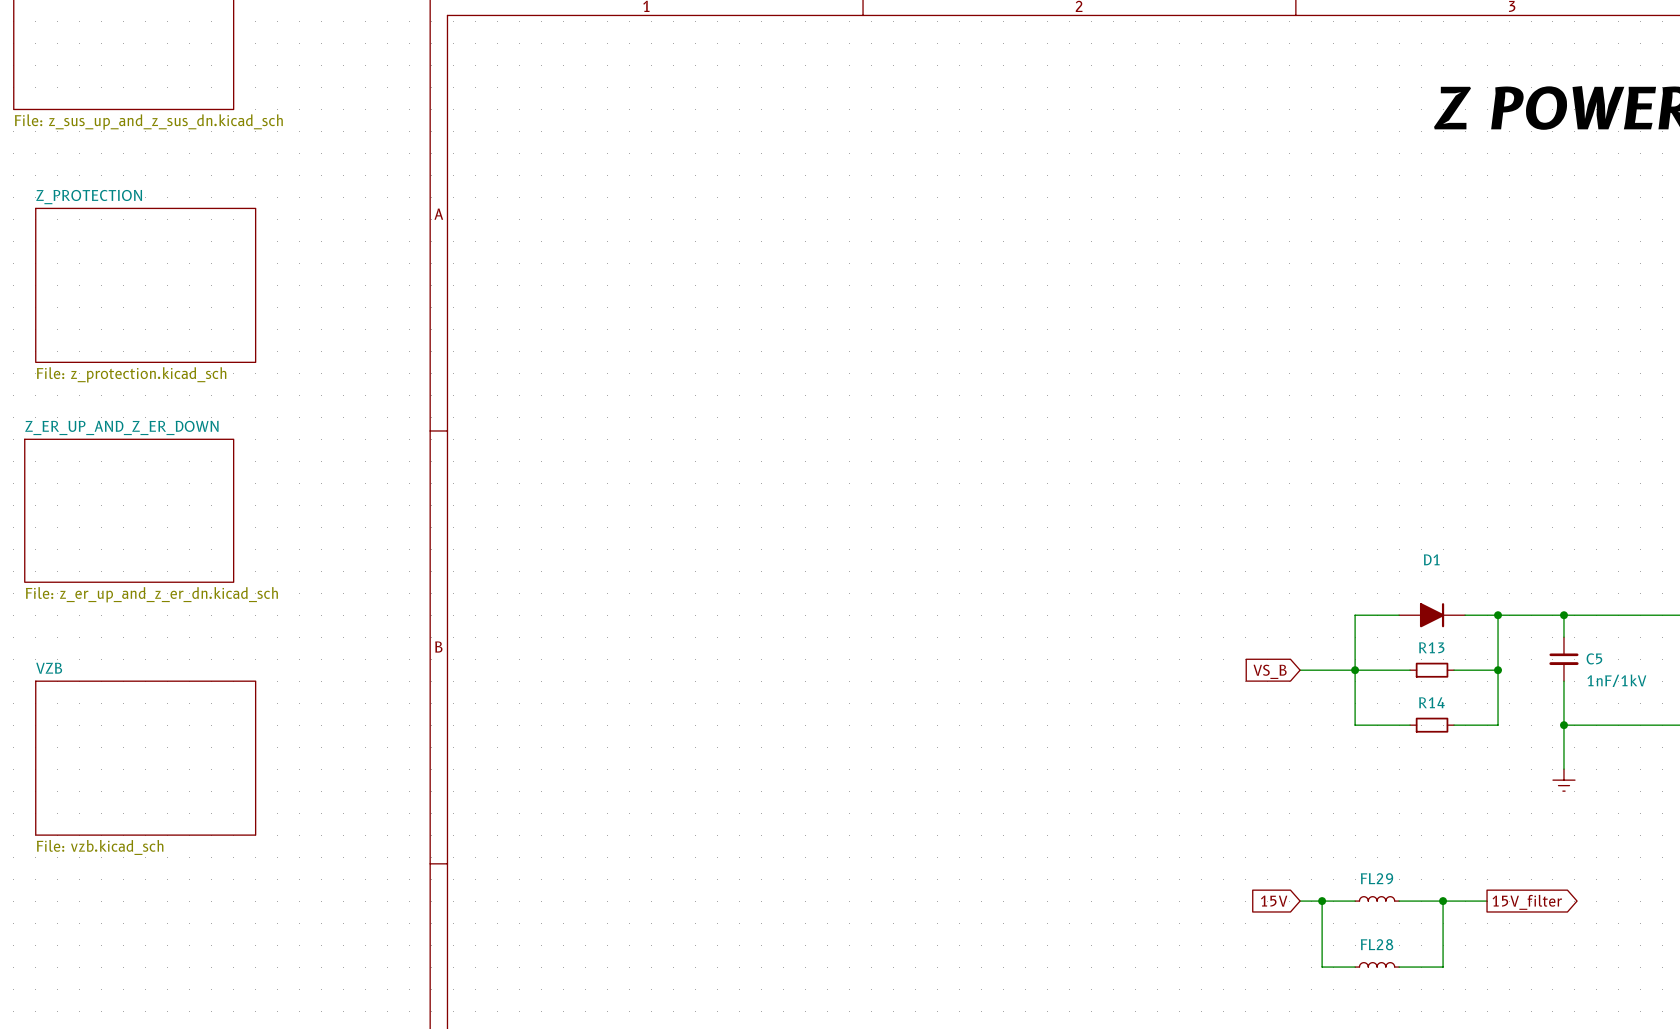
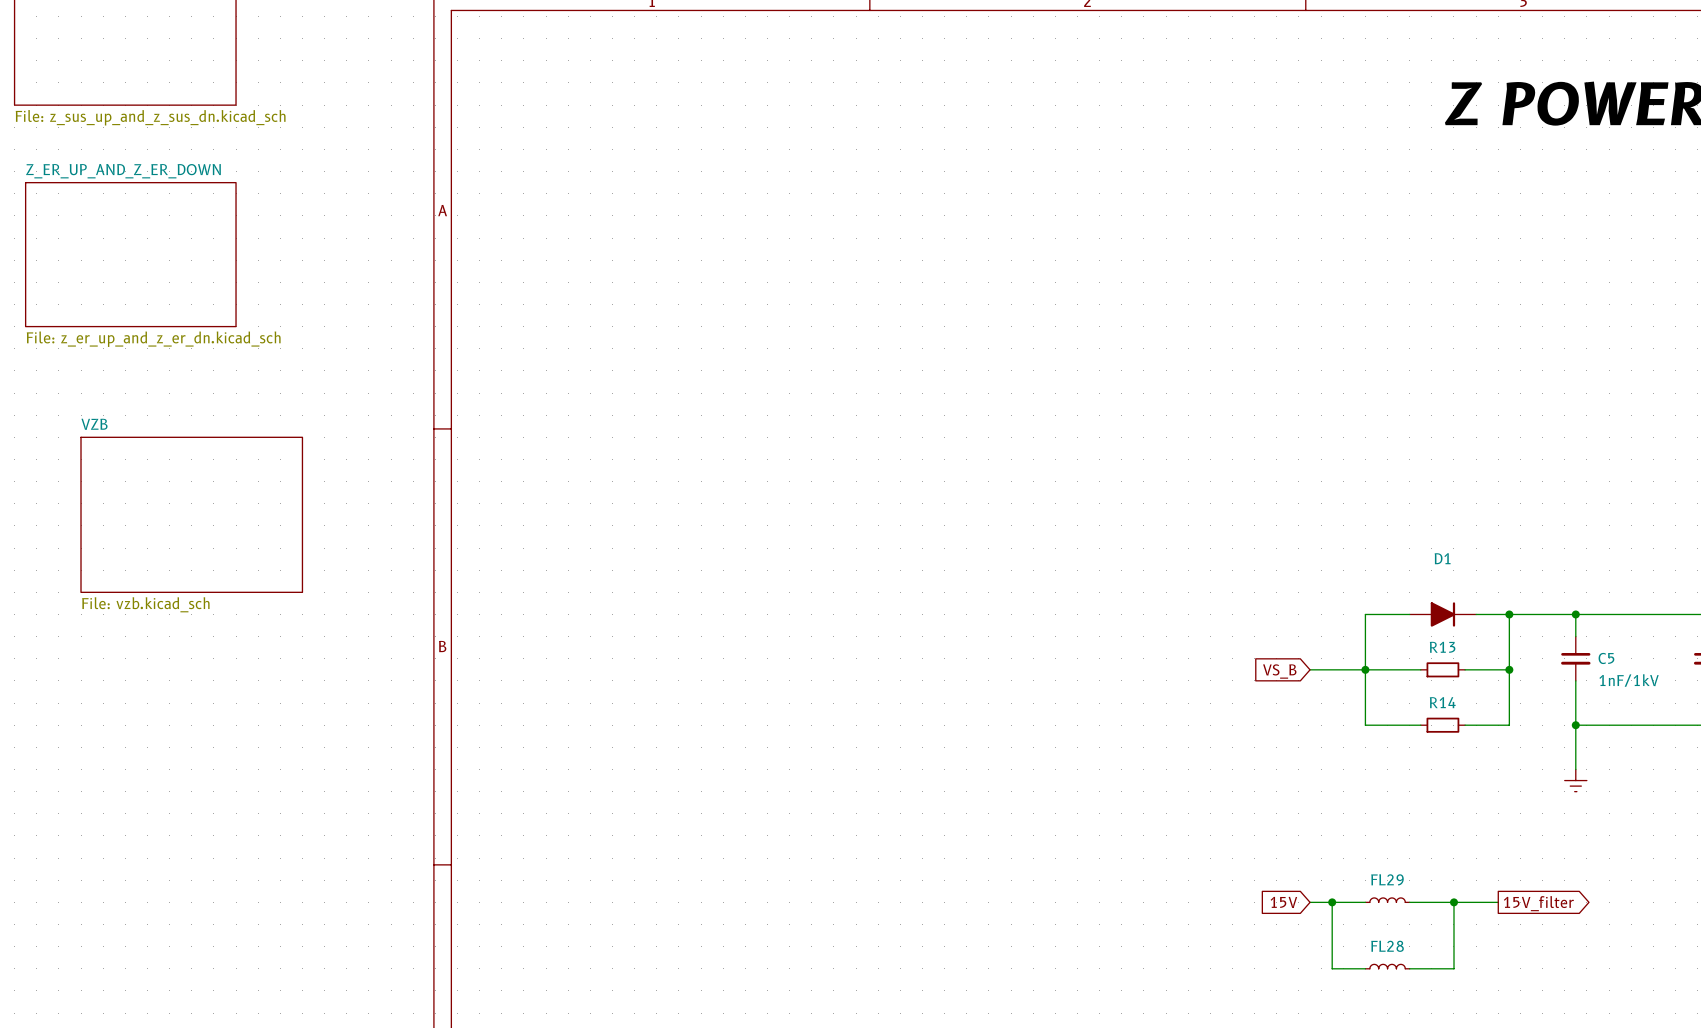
sheet Z_ER_UP_AND_Z_ER_DOWN: none -> File: z_er_up_and_z_er_dn.kicad_sch (130, 254)
sheet Z_PROTECTION: File: z_protection.kicad_sch (145, 285) -> none
sheet Z_ER_UP_AND_Z_ER_DOWN: File: z_er_up_and_z_er_dn.kicad_sch (129, 510) -> none
sheet VZB: none -> File: vzb.kicad_sch (191, 514)
sheet VZB: File: vzb.kicad_sch (145, 758) -> none

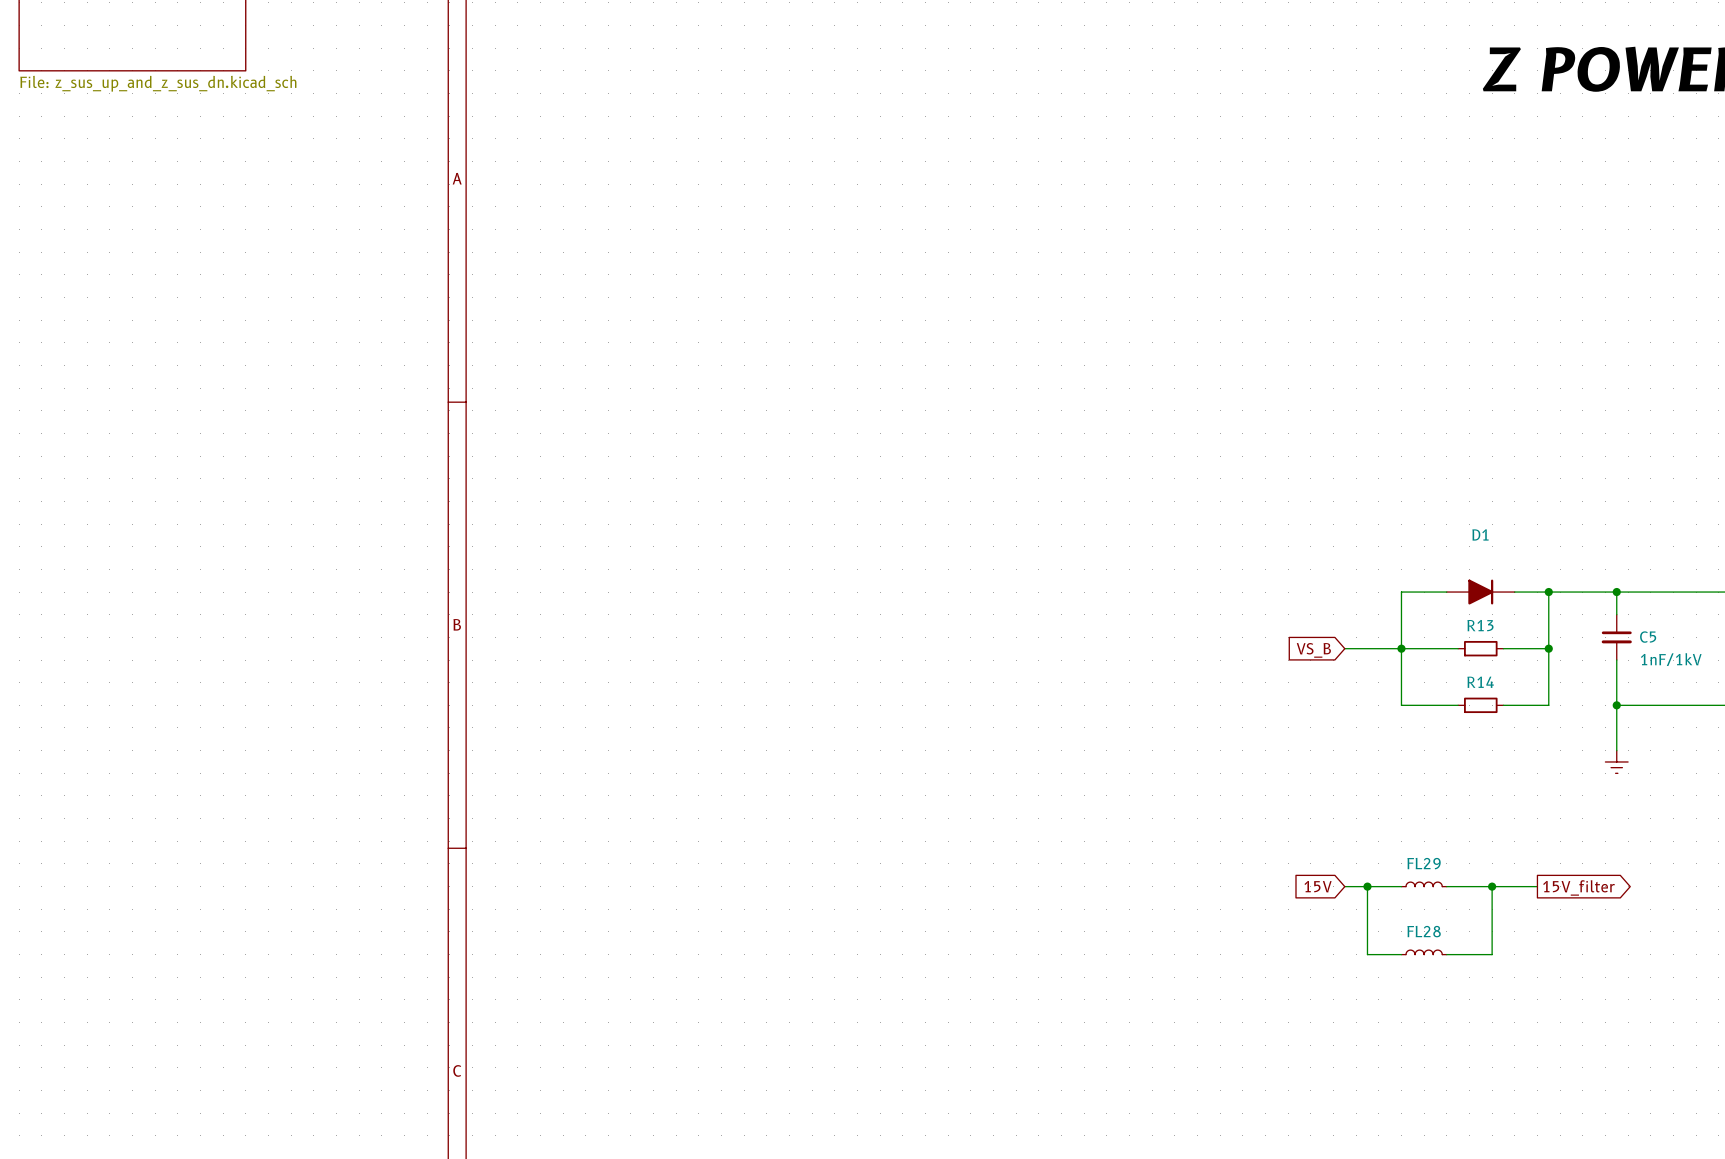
sheet Z_ER_UP_AND_Z_ER_DOWN: File: z_er_up_and_z_er_dn.kicad_sch (130, 254) -> none
sheet VZB: File: vzb.kicad_sch (191, 514) -> none

